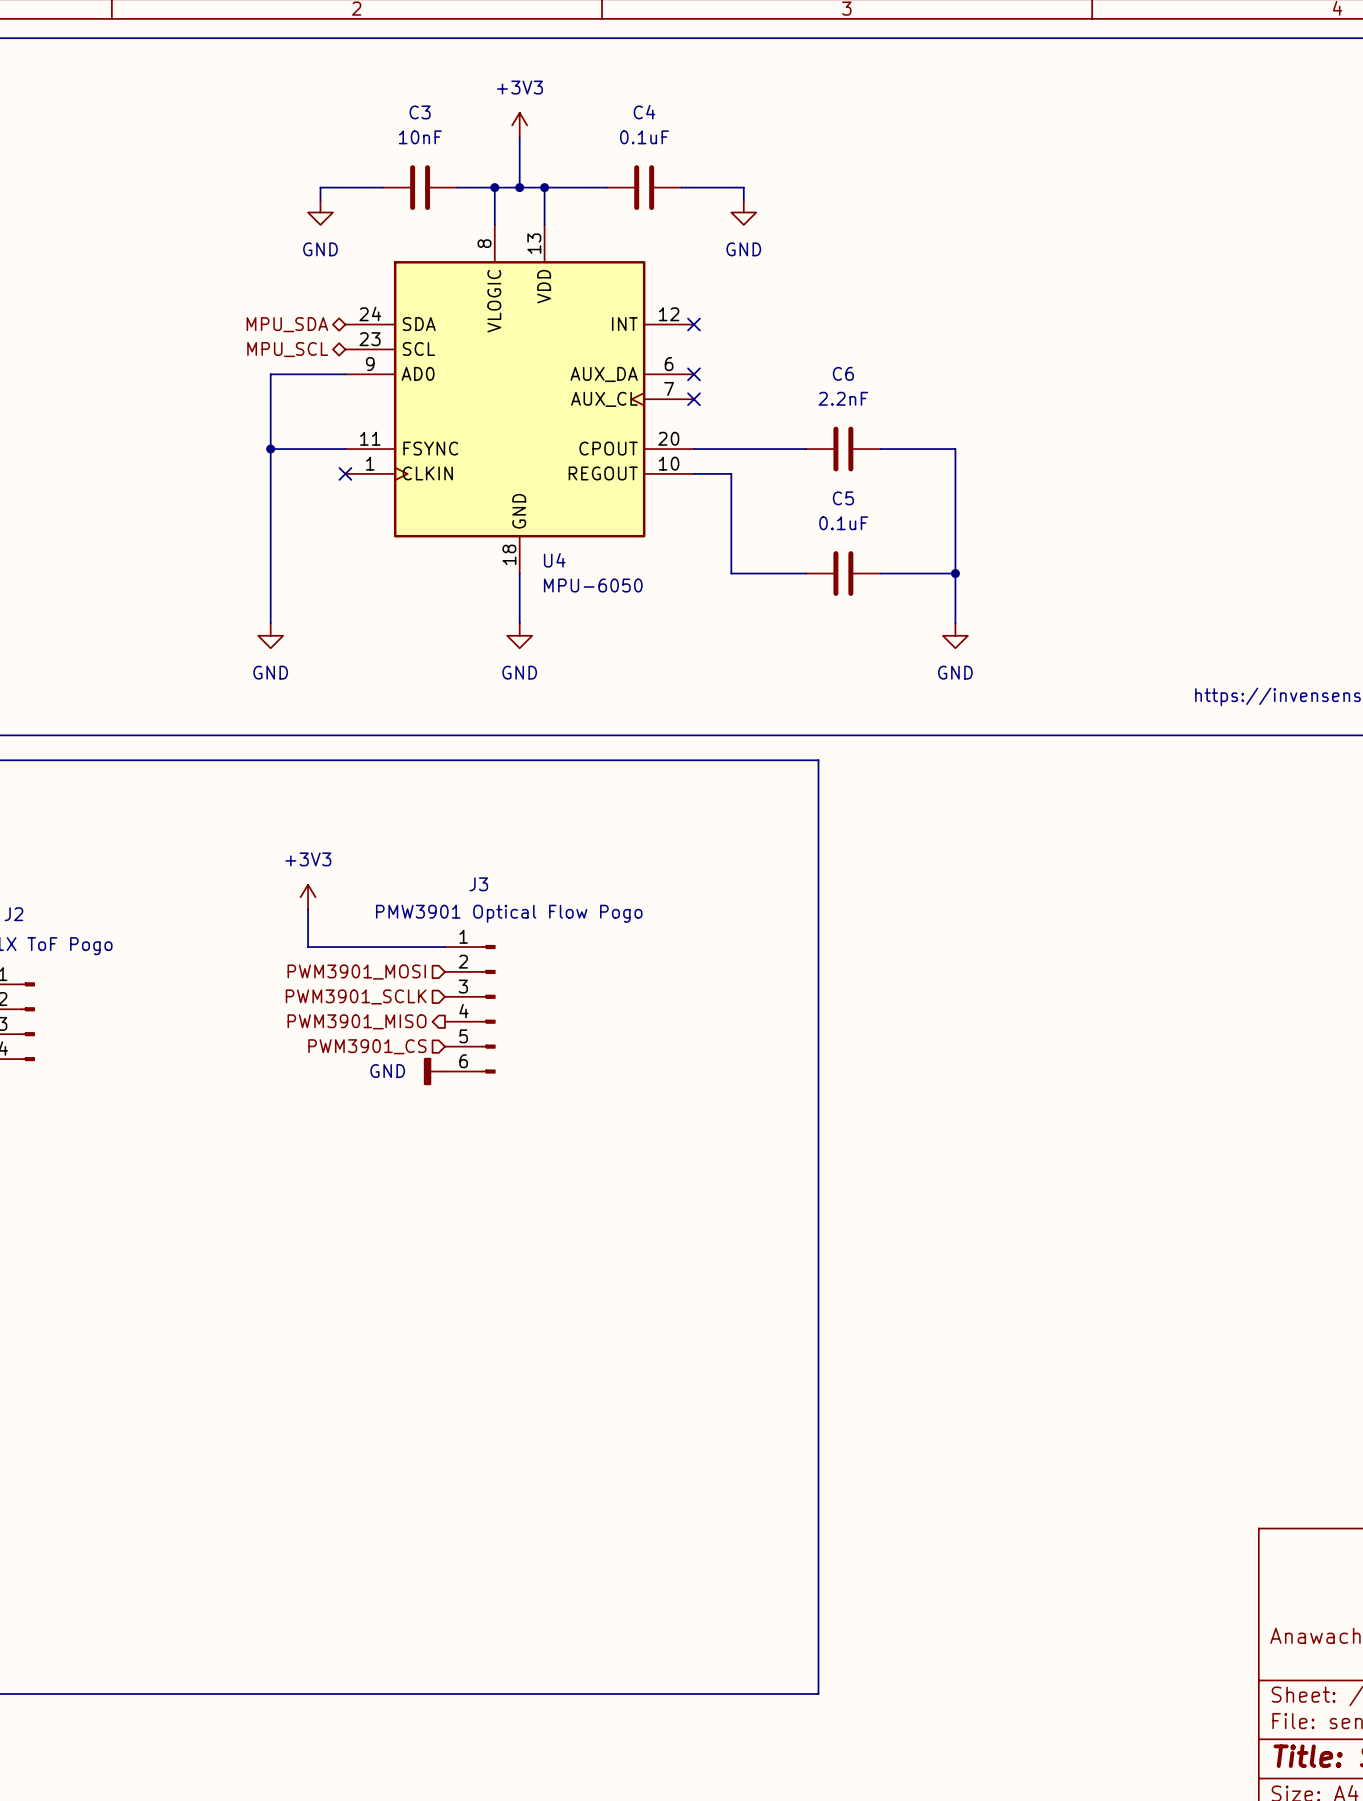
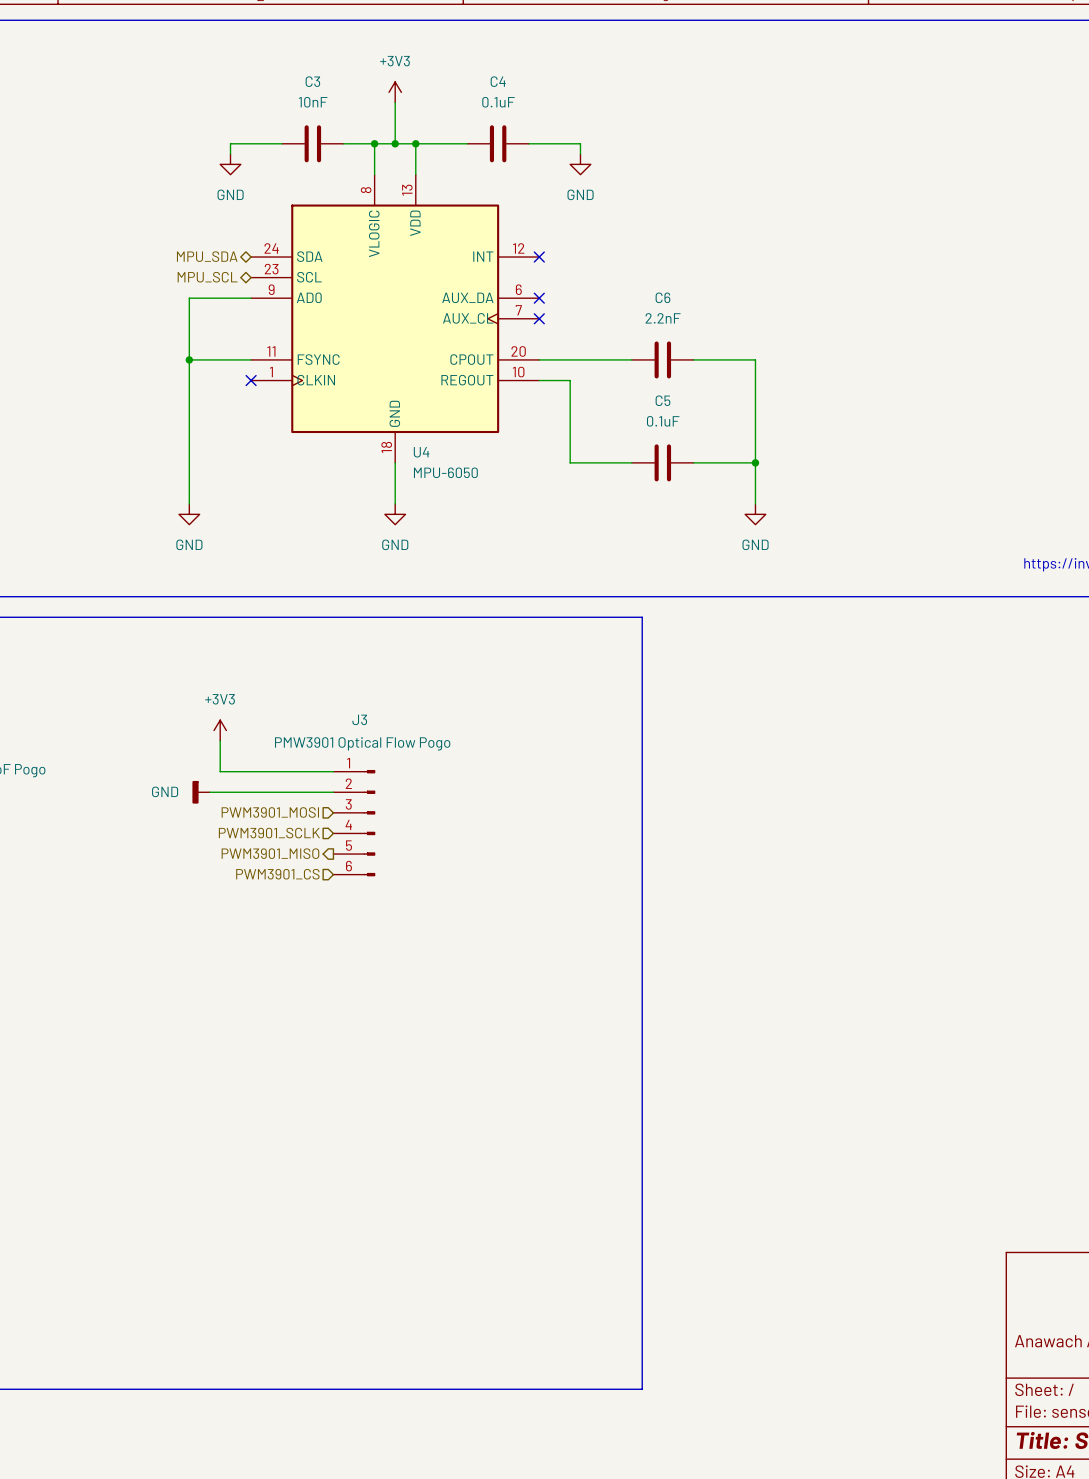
wire: none -> (209, 792) (333, 792)
hierarchical label: PWM3901_MOSI (356, 972) -> none
hierarchical label: PWM3901_SCLK (356, 996) -> PWM3901_MOSI (270, 812)
hierarchical label shape: output (357, 1021) -> input (269, 833)
hierarchical label: PWM3901_MISO (357, 1021) -> PWM3901_SCLK (269, 833)
hierarchical label shape: input (367, 1046) -> output (270, 853)
hierarchical label: PWM3901_CS (367, 1046) -> PWM3901_MISO (270, 853)
hierarchical label: none -> PWM3901_CS (277, 874)
power symbol position: GND (434, 1071) -> GND (201, 792)

